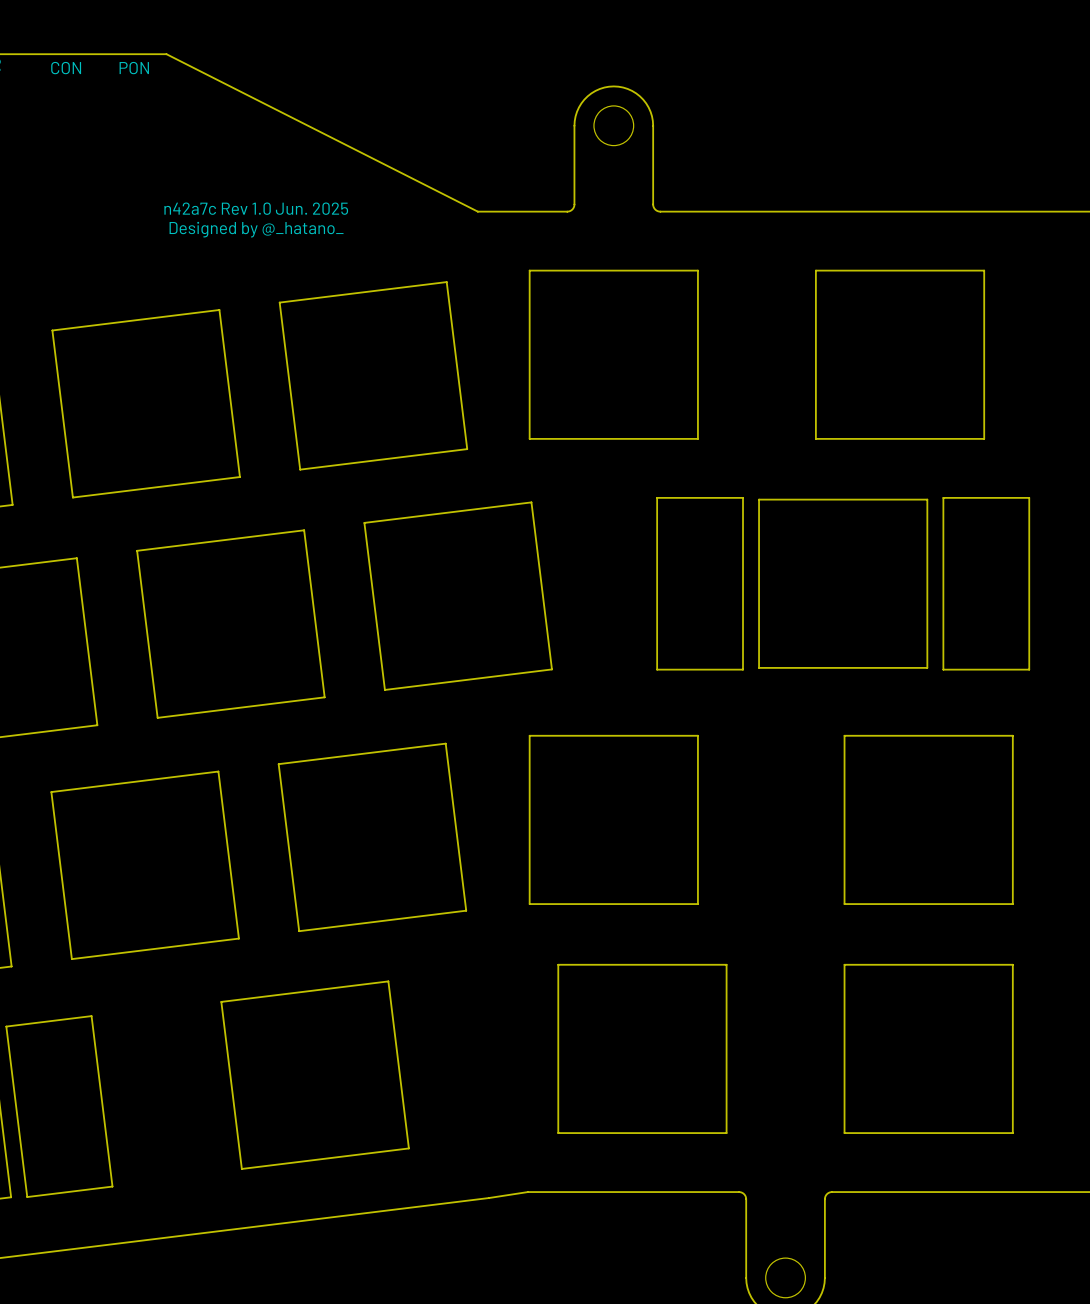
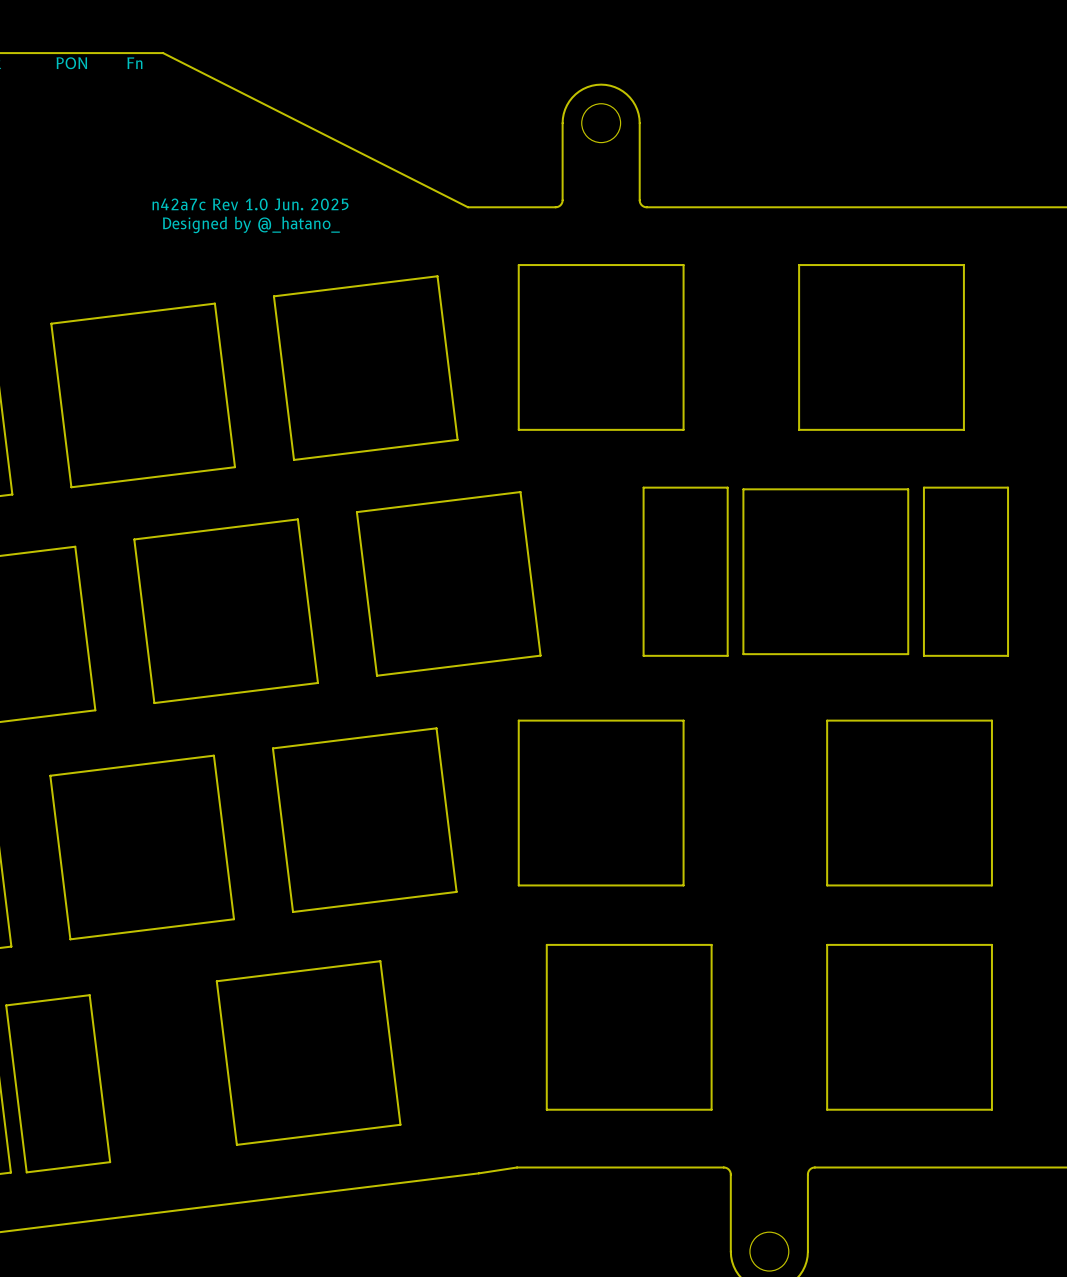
text: none -> Fn (134, 63)
text: CON (66, 68) -> none
text position: PON (134, 68) -> PON (71, 63)

